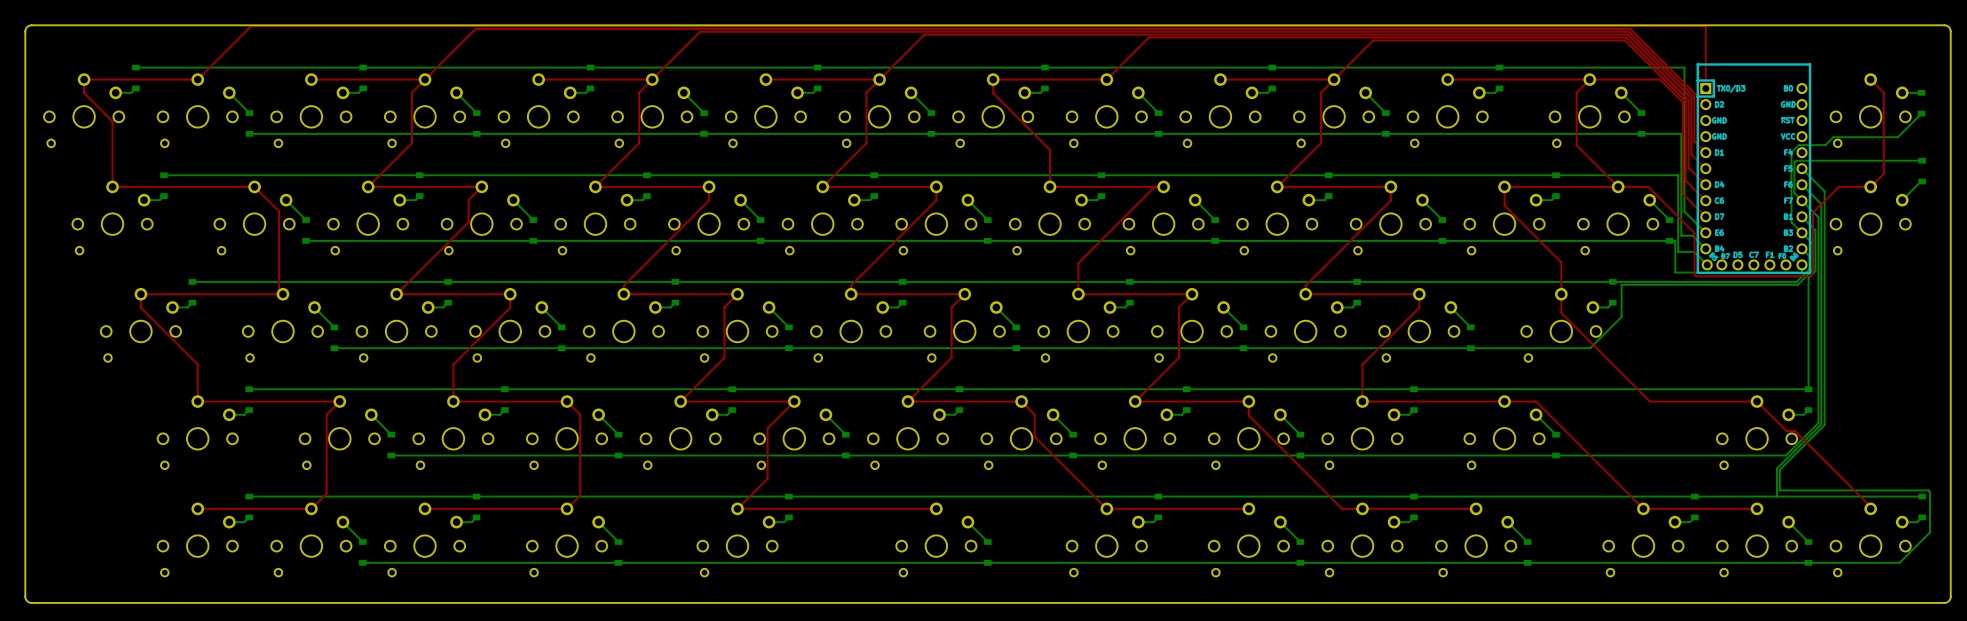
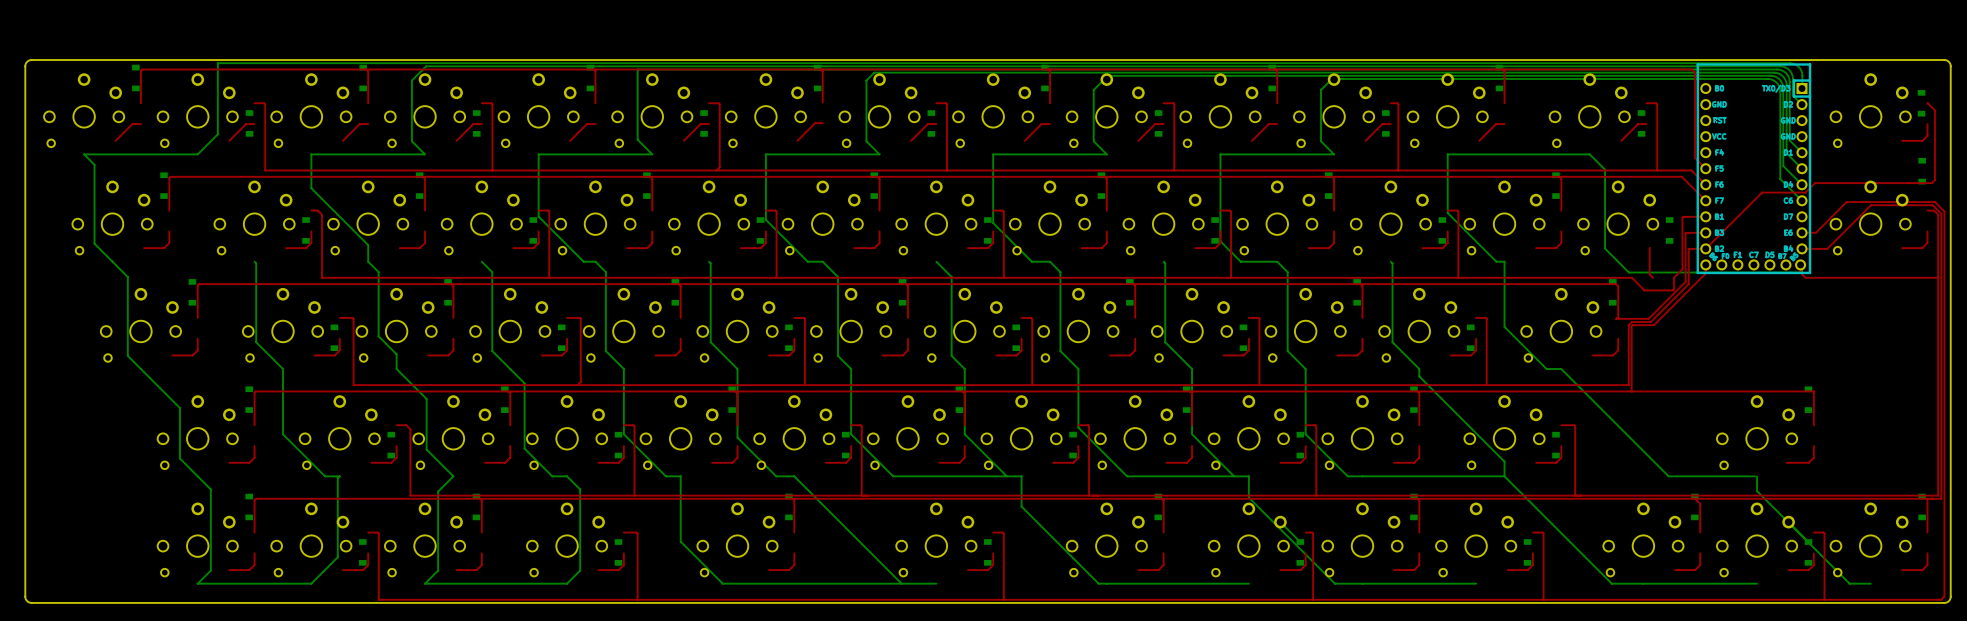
board edge: (25, 66) (25, 30) (27, 27) (31, 25) (1944, 25) (1948, 26) (1950, 30) (1950, 66) -> (25, 66) (27, 61) (31, 60) (1944, 60) (1948, 61) (1950, 66)
bottom track: (135, 67) (1684, 67) (1684, 211) (1705, 232) -> none
top track: none -> (366, 69) (368, 71) (368, 103)
top track: none -> (593, 69) (595, 71) (595, 103)
top track: none -> (820, 69) (822, 71) (822, 102)
top track: none -> (1047, 69) (1050, 71) (1050, 103)
top track: none -> (1275, 69) (1277, 71) (1277, 103)
top track: none -> (1502, 69) (1504, 71) (1504, 103)
top track: (311, 79) (425, 79) -> none
top track: (538, 79) (652, 79) -> none
top track: (765, 79) (879, 79) -> none
top track: (1220, 79) (1334, 79) -> none
top track: (1447, 79) (1660, 79) (1682, 102) (1682, 193) (1705, 216) -> (311, 210) (317, 210) (322, 214) (322, 277) (1631, 277) (1644, 290) (1673, 289) (1673, 277) (1682, 269) (1682, 217) (1705, 216)
top track: (1589, 79) (1576, 92) (1576, 145) (1618, 186) -> none
top track: (1870, 79) (1883, 92) (1883, 173) (1870, 186) (1838, 186) (1813, 212) (1813, 273) (1810, 276) (1696, 276) (1694, 274) (1694, 233) (1648, 186) (1504, 186) (1504, 205) (1561, 262) (1561, 312) (1650, 401) (1757, 401) (1786, 431) (1794, 431) (1870, 508) -> none
bottom track: (135, 88) (131, 92) (115, 92) -> none
bottom track: (363, 88) (358, 92) (342, 92) -> none
bottom track: (590, 88) (586, 92) (570, 92) -> none
bottom track: (817, 88) (813, 92) (797, 92) -> none
bottom track: (1044, 88) (1040, 92) (1024, 92) -> none
bottom track: (1272, 88) (1267, 92) (1252, 92) -> none
bottom track: (1499, 88) (1495, 92) (1479, 92) -> none
top track: (1705, 88) (1705, 26) (251, 26) (197, 79) (84, 79) (84, 93) (112, 121) (112, 186) (254, 186) (279, 211) (279, 290) (282, 294) (140, 294) (140, 307) (197, 364) (197, 401) (339, 401) (326, 414) (326, 493) (311, 508) (197, 508) -> none
bottom track: none -> (1802, 88) (1801, 70) (1796, 65) (1789, 63) (217, 63) (217, 134) (197, 154) (84, 154) (94, 164) (94, 243) (127, 277) (127, 355) (179, 408) (179, 458) (210, 489) (210, 570) (197, 583) (311, 583) (337, 557) (337, 478) (339, 476) (325, 476) (282, 434) (282, 369) (256, 342) (256, 263) (254, 261)
bottom track: (229, 92) (249, 113) -> none
bottom track: (456, 92) (476, 113) -> none
bottom track: (683, 92) (704, 113) -> none
bottom track: (911, 92) (931, 113) -> none
bottom track: (1138, 92) (1158, 113) -> none
bottom track: (1365, 92) (1385, 113) -> none
bottom track: (1621, 92) (1641, 113) -> none
bottom track: (1902, 92) (1921, 92) -> none
top track: none -> (481, 103) (492, 104) (492, 170)
top track: none -> (709, 103) (719, 104) (719, 167) (716, 170)
top track: none -> (936, 103) (946, 104) (946, 170)
top track: none -> (1163, 103) (1174, 104) (1174, 170)
top track: none -> (1390, 103) (1398, 104) (1398, 170)
top track: none -> (1646, 103) (1657, 104) (1657, 170)
top track: none -> (1927, 103) (1934, 110) (1934, 179) (1931, 183) (1815, 183) (1805, 192) (1762, 192) (1705, 248) (1688, 249) (1688, 284) (1650, 322) (1631, 322) (1628, 325) (1628, 385) (353, 385) (353, 318) (339, 317)
top track: (1705, 104) (1630, 28) (475, 28) (411, 92) (411, 143) (368, 186) (481, 186) (468, 200) (468, 222) (396, 294) (510, 294) (510, 307) (453, 364) (453, 401) (567, 401) (580, 414) (580, 495) (567, 508) (425, 508) -> none
bottom track: none -> (1802, 104) (1792, 95) (1790, 72) (1785, 67) (1780, 66) (426, 66) (411, 80) (411, 141) (425, 154) (311, 154) (311, 188) (368, 245) (368, 261) (378, 272) (378, 336) (396, 354) (396, 369) (426, 399) (426, 449) (453, 476) (438, 491) (438, 570) (425, 583) (567, 583) (580, 570) (580, 489) (567, 476) (552, 476) (524, 448) (524, 383) (492, 351) (492, 272) (481, 261)
bottom track: (1921, 113) (1898, 137) (1833, 137) (1825, 145) (1798, 145) (1791, 153) -> none
top track: none -> (822, 123) (815, 123) (797, 140)
top track: none -> (140, 124) (132, 124) (115, 140)
top track: none -> (254, 124) (246, 124) (229, 140)
top track: none -> (368, 124) (359, 124) (342, 140)
top track: none -> (481, 124) (473, 124) (456, 140)
top track: none -> (595, 124) (586, 124) (570, 140)
top track: none -> (709, 124) (700, 124) (683, 140)
top track: none -> (936, 124) (927, 124) (911, 140)
top track: none -> (1050, 124) (1041, 124) (1024, 140)
top track: none -> (1163, 124) (1155, 124) (1138, 140)
top track: none -> (1277, 124) (1268, 124) (1252, 140)
top track: none -> (1390, 124) (1382, 124) (1365, 140)
top track: none -> (1504, 124) (1496, 124) (1479, 140)
top track: none -> (1646, 124) (1638, 124) (1621, 140)
top track: none -> (1927, 124) (1927, 135) (1922, 140) (1902, 140)
bottom track: (249, 133) (1681, 133) (1681, 235) (1692, 235) (1705, 248) -> none
top track: (1705, 152) (1694, 141) (1694, 97) (1628, 31) (700, 31) (639, 92) (639, 143) (595, 186) (709, 186) (709, 200) (623, 285) (623, 294) (737, 294) (724, 307) (724, 357) (680, 401) (794, 401) (767, 428) (767, 478) (737, 508) (936, 508) -> none
bottom track: none -> (1802, 152) (1789, 140) (1789, 80) (1786, 73) (1778, 69) (637, 69) (637, 139) (652, 154) (538, 154) (538, 216) (583, 261) (595, 261) (605, 272) (605, 351) (623, 369) (623, 434) (665, 476) (680, 476) (680, 541) (722, 583) (936, 583)
bottom track: (1791, 153) (1791, 222) (1812, 243) (1812, 270) (1797, 284) (1621, 284) (1621, 316) (1590, 348) (334, 348) -> none
top track: (1695, 157) (1691, 154) (1691, 98) (1627, 34) (924, 34) (866, 92) (866, 143) (822, 186) (936, 186) (936, 200) (851, 285) (851, 294) (964, 294) (951, 307) (951, 357) (907, 401) (1021, 401) (1034, 414) (1034, 436) (1106, 508) (1248, 508) -> (1695, 157) (1695, 72) (1691, 69) (142, 69) (140, 103)
bottom track: (1922, 160) (1796, 160) (1794, 162) (1794, 193) -> (1504, 476) (1347, 476) (1305, 434) (1305, 369) (1287, 351) (1287, 272) (1277, 261) (1240, 261) (1220, 241) (1220, 154) (1334, 154) (1320, 141) (1320, 90) (1332, 78) (1769, 79) (1776, 82) (1780, 90) (1780, 179) (1794, 193)
part side: top (1753, 168) -> bottom (1753, 168)
bottom track: (1802, 168) (1824, 191) (1824, 425) (1779, 469) (1779, 490) (1928, 490) (1930, 532) (1899, 562) (362, 562) -> (1802, 168) (1786, 153) (1786, 83) (1782, 76) (1773, 72) (874, 72) (866, 80) (866, 141) (879, 154) (765, 154) (765, 219) (807, 261) (822, 261) (838, 277) (838, 355) (851, 369) (851, 434) (893, 476) (1021, 476) (1021, 506) (1098, 583) (1248, 583)
top track: (1691, 170) (1688, 167) (1688, 99) (1626, 37) (1148, 37) (1106, 79) (993, 79) (993, 93) (1050, 149) (1050, 186) (1163, 186) -> (1691, 170) (265, 170) (265, 104) (254, 103)
bottom track: (163, 175) (1678, 175) (1678, 251) (1694, 251) (1707, 264) -> none
top track: none -> (423, 176) (425, 178) (425, 210)
top track: none -> (650, 176) (652, 178) (652, 210)
top track: none -> (877, 176) (879, 178) (879, 210)
top track: none -> (1104, 176) (1106, 178) (1106, 210)
top track: none -> (1332, 176) (1334, 178) (1334, 210)
top track: none -> (1559, 176) (1561, 178) (1561, 210)
top track: (1685, 180) (1685, 101) (1624, 40) (1373, 40) (1320, 92) (1320, 143) (1277, 186) (1390, 186) (1390, 200) (1305, 285) (1305, 294) (1419, 294) (1419, 307) (1362, 364) (1362, 401) (1536, 401) (1643, 508) (1757, 508) -> (1685, 180) (1681, 176) (170, 176) (169, 210)
bottom track: (1922, 181) (1902, 200) -> none
bottom track: (1802, 184) (1821, 204) (1821, 424) (1776, 468) (1776, 496) -> (1802, 184) (1783, 166) (1783, 87) (1778, 78) (1770, 75) (1107, 75) (1093, 90) (1093, 141) (1106, 154) (993, 154) (993, 223) (1031, 261) (1050, 261) (1060, 272) (1060, 351) (1078, 369) (1078, 427) (1127, 476) (1248, 476) (1248, 497) (1334, 583) (1476, 583)
top track: (1154, 186) (1078, 263) (1078, 294) (1192, 294) (1178, 307) (1178, 357) (1135, 401) (1248, 401) (1248, 415) (1342, 508) (1476, 508) -> none
bottom track: (163, 196) (159, 200) (144, 200) -> none
bottom track: (419, 196) (415, 200) (399, 200) -> none
bottom track: (646, 196) (642, 200) (627, 200) -> none
bottom track: (874, 196) (870, 200) (854, 200) -> none
bottom track: (1101, 196) (1097, 200) (1081, 200) -> none
bottom track: (1328, 196) (1324, 200) (1308, 200) -> none
bottom track: (1556, 196) (1551, 200) (1536, 200) -> none
bottom track: (286, 200) (306, 220) -> none
bottom track: (513, 200) (533, 220) -> none
bottom track: (740, 200) (760, 220) -> none
bottom track: (967, 200) (987, 220) -> none
bottom track: (1195, 200) (1215, 220) -> none
bottom track: (1422, 200) (1442, 220) -> none
bottom track: (1649, 200) (1669, 220) -> none
bottom track: (1802, 200) (1818, 217) (1818, 423) (1785, 455) (391, 455) -> none
top track: none -> (538, 210) (549, 211) (549, 277)
top track: none -> (765, 210) (776, 211) (776, 277)
top track: none -> (993, 210) (1003, 211) (1003, 277)
top track: none -> (1220, 210) (1231, 211) (1231, 277)
top track: none -> (1447, 210) (1458, 211) (1458, 277)
top track: none -> (1927, 210) (1934, 210) (1938, 214) (1938, 495) (410, 495) (410, 429) (406, 425) (396, 425)
bottom track: (1802, 216) (1815, 230) (1815, 271) (1808, 278) (1808, 389) (249, 389) -> none
top track: none -> (169, 231) (169, 243) (164, 248) (144, 248)
top track: none -> (311, 231) (311, 243) (306, 248) (286, 248)
top track: none -> (425, 231) (425, 243) (419, 248) (399, 248)
top track: none -> (538, 231) (538, 243) (533, 248) (513, 248)
top track: none -> (652, 231) (652, 243) (647, 248) (627, 248)
top track: none -> (765, 231) (765, 243) (760, 248) (740, 248)
top track: none -> (879, 231) (879, 243) (874, 248) (854, 248)
top track: none -> (993, 231) (993, 243) (988, 248) (967, 248)
top track: none -> (1106, 231) (1106, 243) (1101, 248) (1081, 248)
top track: none -> (1220, 231) (1220, 243) (1215, 248) (1195, 248)
top track: none -> (1334, 231) (1334, 243) (1329, 248) (1308, 248)
top track: none -> (1447, 231) (1447, 243) (1442, 248) (1422, 248)
top track: none -> (1561, 231) (1561, 243) (1556, 248) (1536, 248)
top track: none -> (1927, 231) (1927, 243) (1922, 248) (1902, 248)
top track: none -> (1705, 232) (1685, 233) (1685, 281) (1648, 318) (1616, 318) (1618, 317) (1618, 286) (1616, 284) (198, 284) (197, 317)
top track: none -> (1802, 232) (1815, 232) (1846, 202) (1934, 202) (1944, 211) (1944, 596) (1941, 599) (378, 599) (378, 533) (368, 532)
bottom track: (306, 240) (1675, 240) (1675, 272) -> (1755, 476) (1668, 476) (1561, 369) (1546, 369) (1504, 326) (1504, 261) (1496, 261) (1447, 213) (1447, 154) (1589, 154) (1605, 169) (1605, 248) (1628, 272) (1675, 272)
top track: none -> (1649, 247) (1649, 274) (1653, 277)
bottom track: (1802, 248) (1809, 256) (1809, 268) (1796, 281) (192, 281) -> none
top track: none -> (1802, 248) (1827, 248) (1871, 205) (1932, 205) (1941, 213) (1941, 498) (255, 498) (254, 532)
bottom track: none -> (709, 261) (710, 263) (710, 342) (737, 369) (737, 437) (776, 476) (794, 476) (901, 583)
bottom track: none -> (936, 261) (951, 277) (951, 355) (964, 369) (964, 434) (1006, 476)
bottom track: none -> (1163, 261) (1165, 263) (1165, 342) (1192, 369) (1192, 434) (1234, 476)
bottom track: none -> (1390, 261) (1392, 263) (1392, 342) (1419, 369) (1419, 376) (1504, 461) (1504, 476)
top track: none -> (1705, 264) (1705, 273) (1654, 325) (1631, 326) (1631, 391)
top track: none -> (1800, 264) (1800, 272) (1805, 277) (1938, 277)
top track: none -> (451, 284) (453, 286) (453, 317)
top track: none -> (678, 284) (680, 286) (680, 317)
top track: none -> (905, 284) (907, 286) (907, 317)
top track: none -> (1133, 284) (1135, 286) (1135, 317)
top track: none -> (1360, 284) (1362, 286) (1362, 317)
bottom track: (192, 302) (187, 307) (172, 307) -> none
bottom track: (448, 302) (443, 307) (428, 307) -> none
bottom track: (675, 302) (670, 307) (655, 307) -> none
bottom track: (902, 302) (897, 307) (882, 307) -> none
bottom track: (1129, 302) (1125, 307) (1109, 307) -> none
bottom track: (1357, 302) (1352, 307) (1337, 307) -> none
bottom track: (1612, 302) (1608, 307) (1592, 307) -> none
bottom track: (314, 307) (334, 327) -> none
bottom track: (541, 307) (561, 327) -> none
bottom track: (769, 307) (788, 327) -> none
bottom track: (996, 307) (1016, 327) -> none
bottom track: (1223, 307) (1243, 327) -> none
bottom track: (1450, 307) (1470, 327) -> none
top track: none -> (567, 317) (580, 318) (580, 381) (577, 385)
top track: none -> (794, 317) (804, 318) (804, 385)
top track: none -> (1021, 317) (1032, 318) (1032, 385)
top track: none -> (1248, 317) (1259, 318) (1259, 385)
top track: none -> (1476, 317) (1486, 318) (1486, 385)
top track: none -> (197, 338) (197, 350) (192, 355) (172, 355)
top track: none -> (339, 338) (339, 350) (334, 355) (314, 355)
top track: none -> (453, 338) (453, 350) (448, 355) (428, 355)
top track: none -> (567, 338) (567, 350) (561, 355) (541, 355)
top track: none -> (680, 338) (680, 350) (675, 355) (655, 355)
top track: none -> (794, 338) (794, 350) (789, 355) (769, 355)
top track: none -> (907, 338) (907, 350) (902, 355) (882, 355)
top track: none -> (1021, 338) (1021, 350) (1016, 355) (996, 355)
top track: none -> (1135, 338) (1135, 350) (1130, 355) (1109, 355)
top track: none -> (1248, 338) (1248, 350) (1243, 355) (1223, 355)
top track: none -> (1362, 338) (1362, 350) (1357, 355) (1337, 355)
top track: none -> (1476, 338) (1476, 350) (1471, 355) (1450, 355)
top track: none -> (1618, 338) (1618, 350) (1613, 355) (1592, 355)
top track: none -> (508, 391) (510, 393) (510, 425)
top track: none -> (735, 391) (737, 393) (737, 425)
top track: none -> (962, 391) (964, 393) (964, 425)
top track: none -> (1190, 391) (1192, 393) (1192, 425)
top track: none -> (1417, 391) (1419, 393) (1419, 425)
bottom track: (249, 410) (244, 414) (229, 414) -> none
bottom track: (504, 410) (500, 414) (484, 414) -> none
bottom track: (732, 410) (727, 414) (712, 414) -> none
bottom track: (959, 410) (954, 414) (939, 414) -> none
bottom track: (1186, 410) (1181, 414) (1166, 414) -> none
bottom track: (1413, 410) (1409, 414) (1394, 414) -> none
bottom track: (1808, 410) (1803, 414) (1788, 414) -> none
bottom track: (371, 414) (391, 434) -> none
bottom track: (598, 414) (618, 434) -> none
bottom track: (825, 414) (845, 434) -> none
bottom track: (1053, 414) (1073, 434) -> none
bottom track: (1280, 414) (1300, 434) -> none
bottom track: (1536, 414) (1555, 434) -> none
top track: none -> (254, 425) (255, 391) (1813, 391) (1813, 425)
top track: none -> (623, 425) (634, 426) (634, 495)
top track: none -> (851, 425) (861, 426) (861, 495)
top track: none -> (1078, 425) (1089, 426) (1089, 495)
top track: none -> (1305, 425) (1316, 426) (1316, 495)
top track: none -> (1561, 425) (1575, 426) (1575, 495)
top track: none -> (254, 446) (254, 457) (249, 462) (229, 462)
top track: none -> (396, 446) (396, 457) (391, 462) (371, 462)
top track: none -> (510, 446) (510, 457) (505, 462) (484, 462)
top track: none -> (623, 446) (623, 457) (618, 462) (598, 462)
top track: none -> (737, 446) (737, 457) (732, 462) (712, 462)
top track: none -> (851, 446) (851, 457) (846, 462) (825, 462)
top track: none -> (964, 446) (964, 457) (959, 462) (939, 462)
top track: none -> (1078, 446) (1078, 457) (1073, 462) (1053, 462)
top track: none -> (1192, 446) (1192, 457) (1186, 462) (1166, 462)
top track: none -> (1305, 446) (1305, 457) (1300, 462) (1280, 462)
top track: none -> (1419, 446) (1419, 457) (1414, 462) (1394, 462)
top track: none -> (1561, 446) (1561, 457) (1556, 462) (1536, 462)
top track: none -> (1813, 446) (1813, 457) (1808, 462) (1786, 462)
bottom track: none -> (1504, 476) (1611, 583) (1757, 583)
bottom track: none -> (1757, 476) (1757, 491) (1849, 583) (1870, 583)
bottom track: (249, 496) (1922, 496) -> none
top track: none -> (479, 498) (481, 500) (481, 532)
top track: none -> (792, 498) (794, 500) (794, 532)
top track: none -> (1161, 498) (1163, 500) (1163, 532)
top track: none -> (1417, 498) (1419, 500) (1419, 532)
top track: none -> (1695, 498) (1700, 503) (1700, 532)
top track: none -> (1927, 498) (1927, 532)
bottom track: (249, 517) (244, 522) (229, 522) -> none
bottom track: (476, 517) (471, 522) (456, 522) -> none
bottom track: (788, 517) (784, 522) (769, 522) -> none
bottom track: (1158, 517) (1153, 522) (1138, 522) -> none
bottom track: (1413, 517) (1409, 522) (1394, 522) -> none
bottom track: (1694, 517) (1690, 522) (1674, 522) -> none
bottom track: (1922, 517) (1917, 522) (1902, 522) -> none
bottom track: (342, 522) (362, 542) -> none
bottom track: (598, 522) (618, 542) -> none
bottom track: (967, 522) (987, 542) -> none
bottom track: (1507, 522) (1527, 542) -> none
top track: none -> (623, 532) (637, 533) (637, 599)
top track: none -> (993, 532) (1003, 533) (1003, 599)
top track: none -> (1305, 532) (1313, 533) (1313, 599)
top track: none -> (1532, 532) (1543, 533) (1543, 599)
top track: none -> (1813, 532) (1824, 533) (1824, 599)
top track: none -> (254, 553) (254, 565) (249, 570) (229, 570)
top track: none -> (368, 553) (368, 565) (363, 570) (342, 570)
top track: none -> (481, 553) (481, 565) (476, 570) (456, 570)
top track: none -> (623, 553) (623, 565) (618, 570) (598, 570)
top track: none -> (794, 553) (794, 565) (789, 570) (769, 570)
top track: none -> (993, 553) (993, 565) (988, 570) (967, 570)
top track: none -> (1163, 553) (1163, 565) (1158, 570) (1138, 570)
top track: none -> (1305, 553) (1305, 565) (1300, 570) (1280, 570)
top track: none -> (1419, 553) (1419, 565) (1414, 570) (1394, 570)
top track: none -> (1532, 553) (1532, 565) (1527, 570) (1507, 570)
top track: none -> (1700, 553) (1700, 565) (1695, 570) (1674, 570)
top track: none -> (1813, 553) (1813, 565) (1808, 570) (1788, 570)
top track: none -> (1927, 553) (1927, 565) (1922, 570) (1902, 570)

